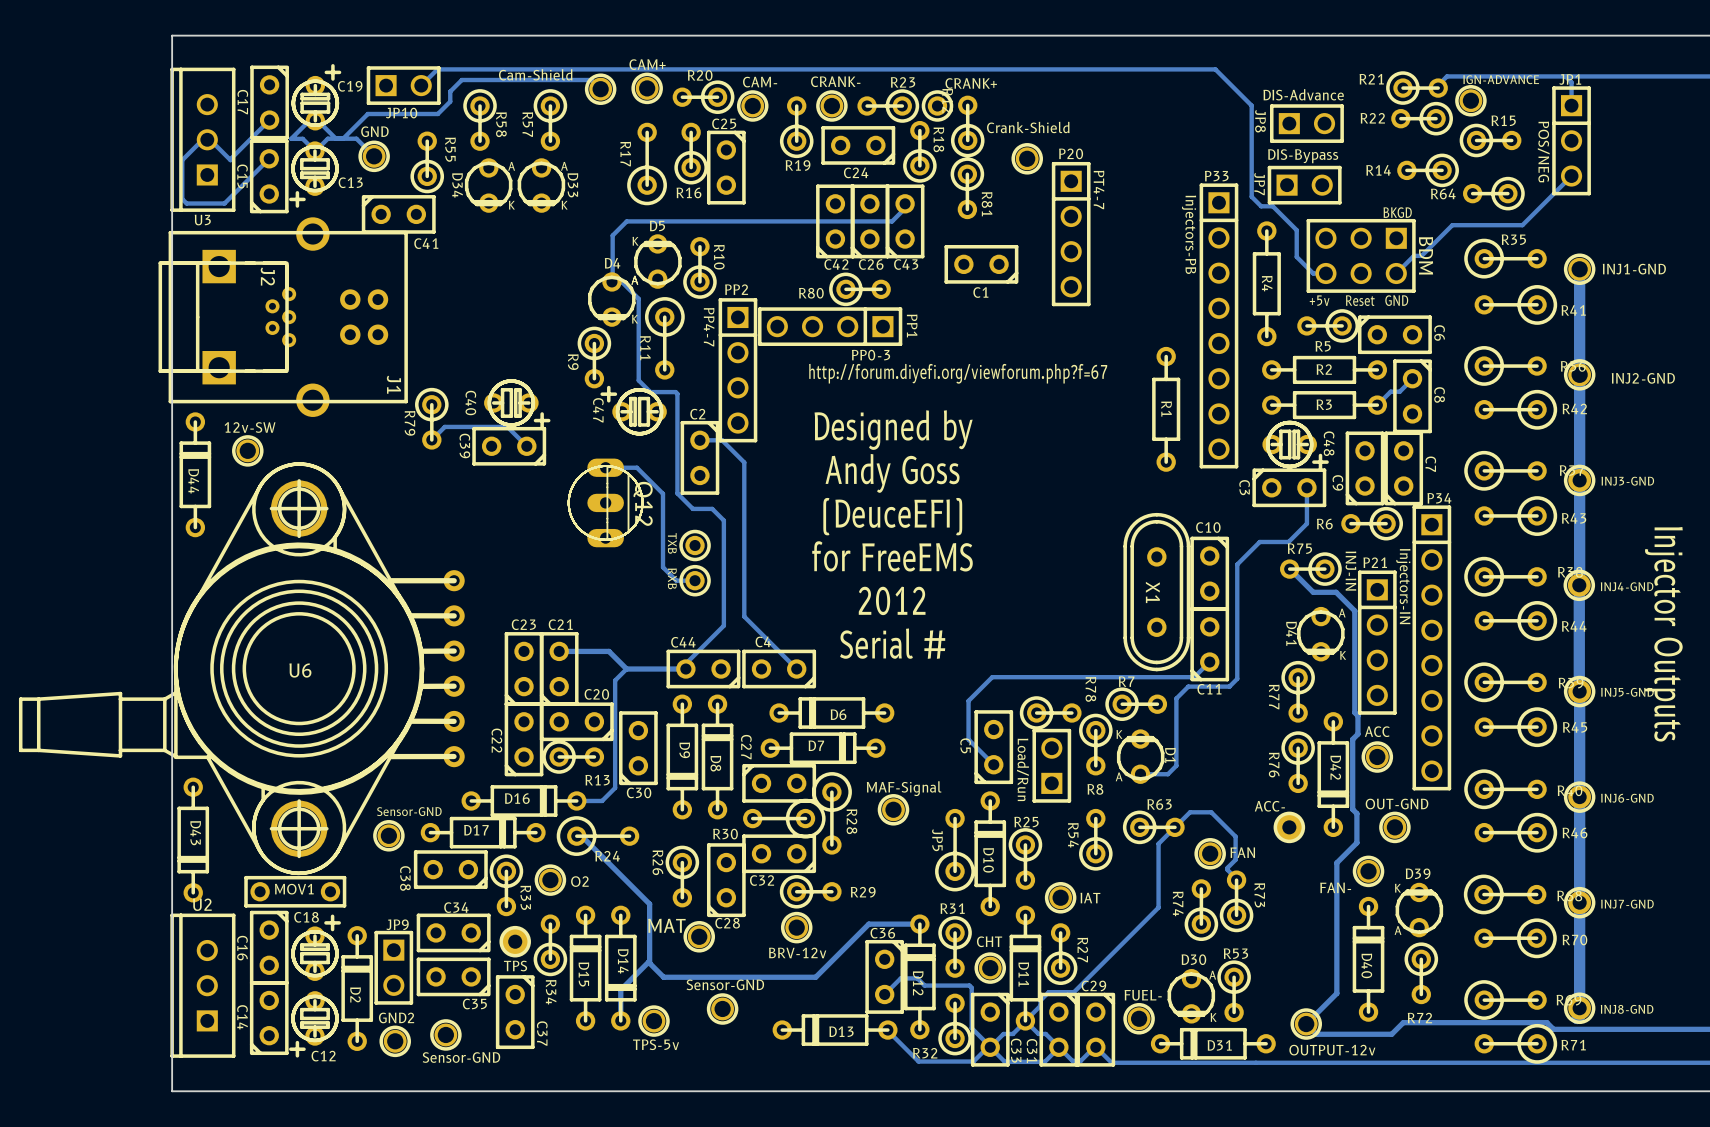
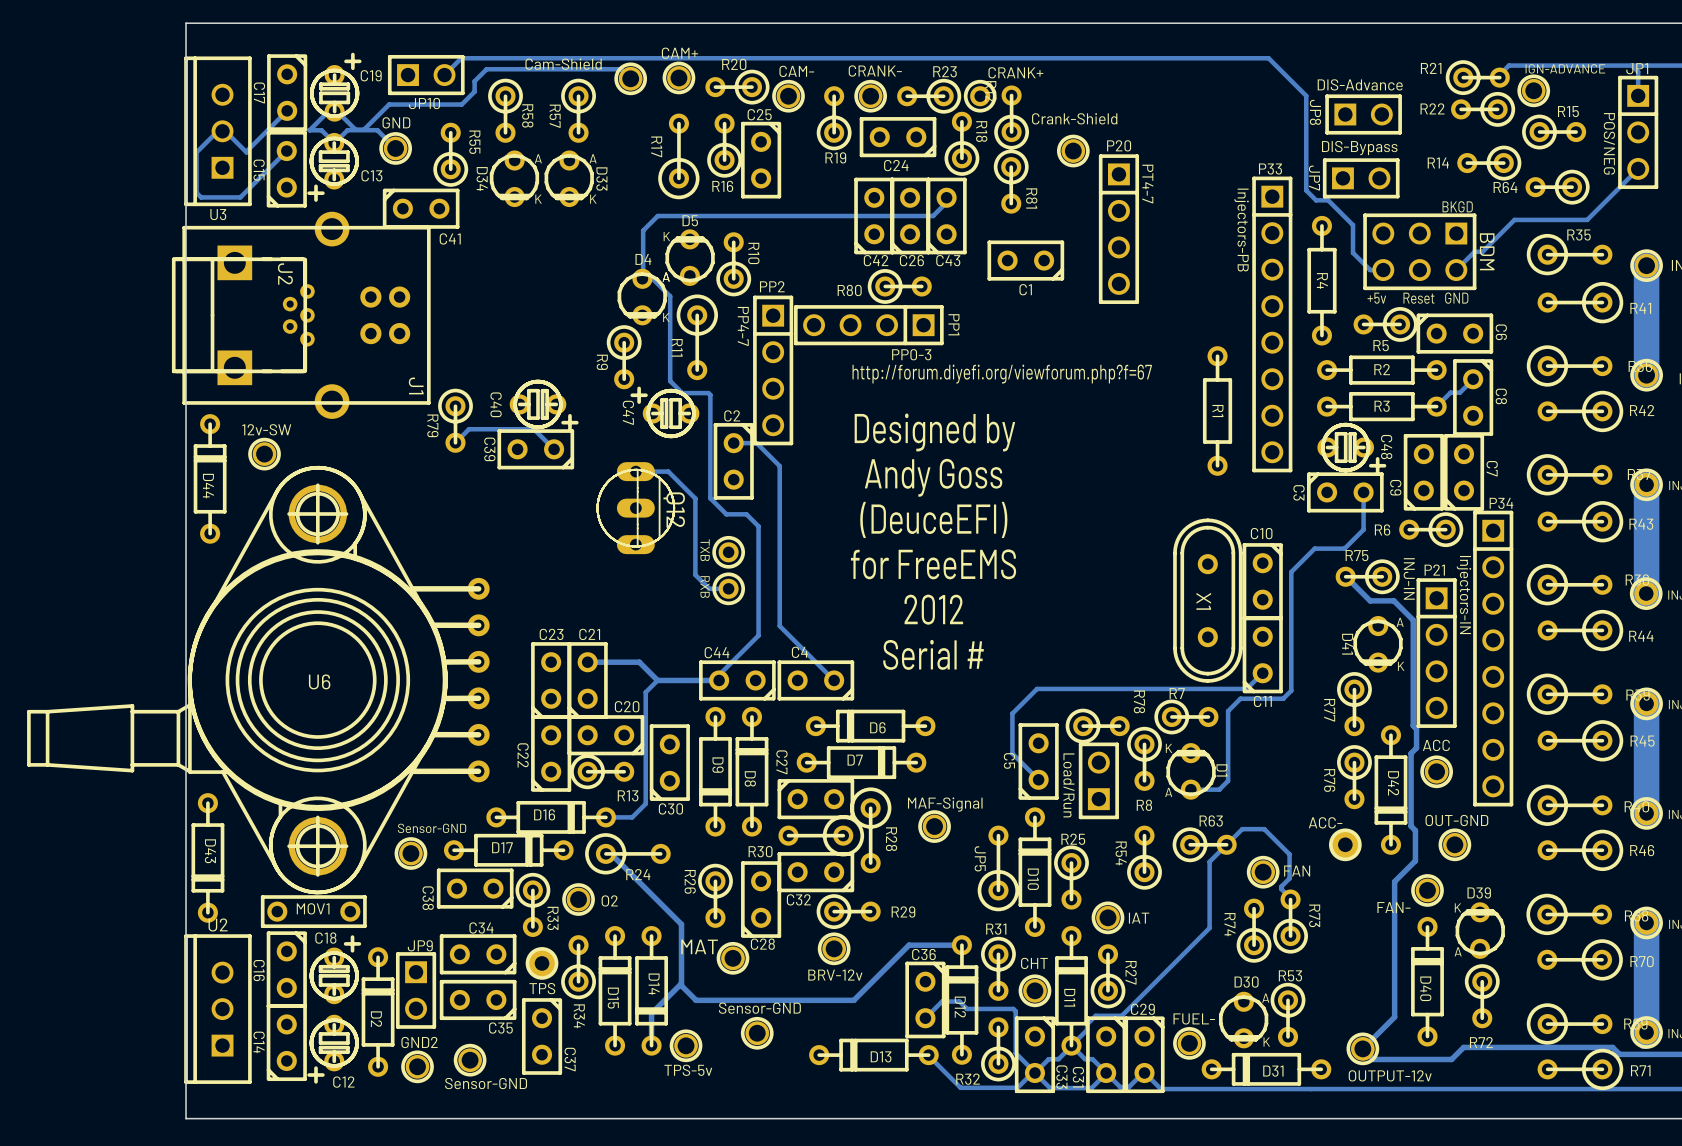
track width: thin (1579, 269) (1579, 374) -> thick (1646, 265) (1646, 375)
track: (1579, 374) (1579, 480) -> none
track width: thin (1579, 480) (1579, 585) -> thick (1646, 484) (1646, 593)
track: (1579, 585) (1579, 691) -> none
track width: thin (1579, 691) (1579, 797) -> thick (1646, 703) (1646, 813)
track: (1579, 797) (1579, 902) -> none
track width: thin (1579, 902) (1579, 1008) -> thick (1646, 922) (1646, 1032)

